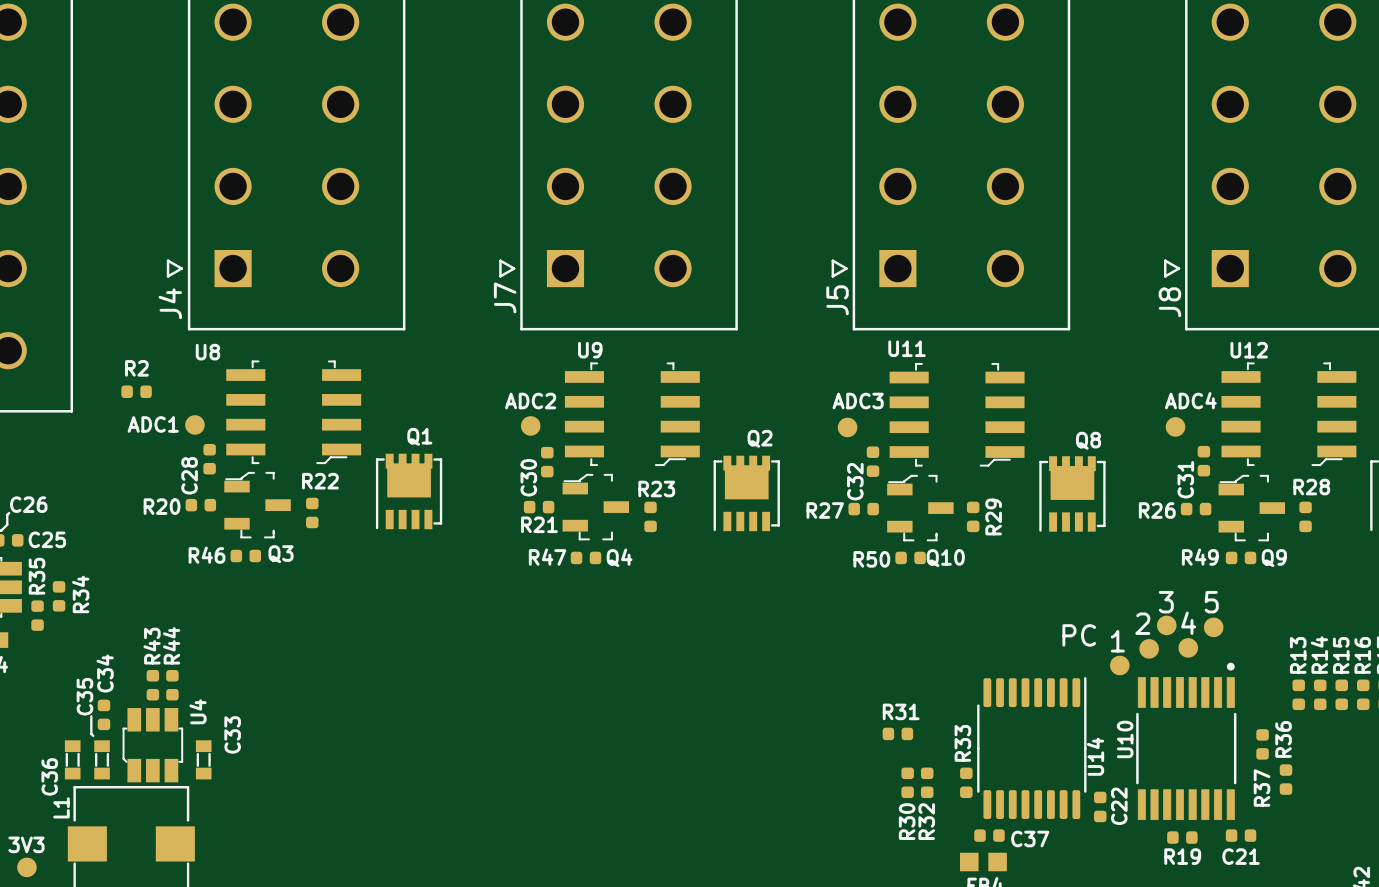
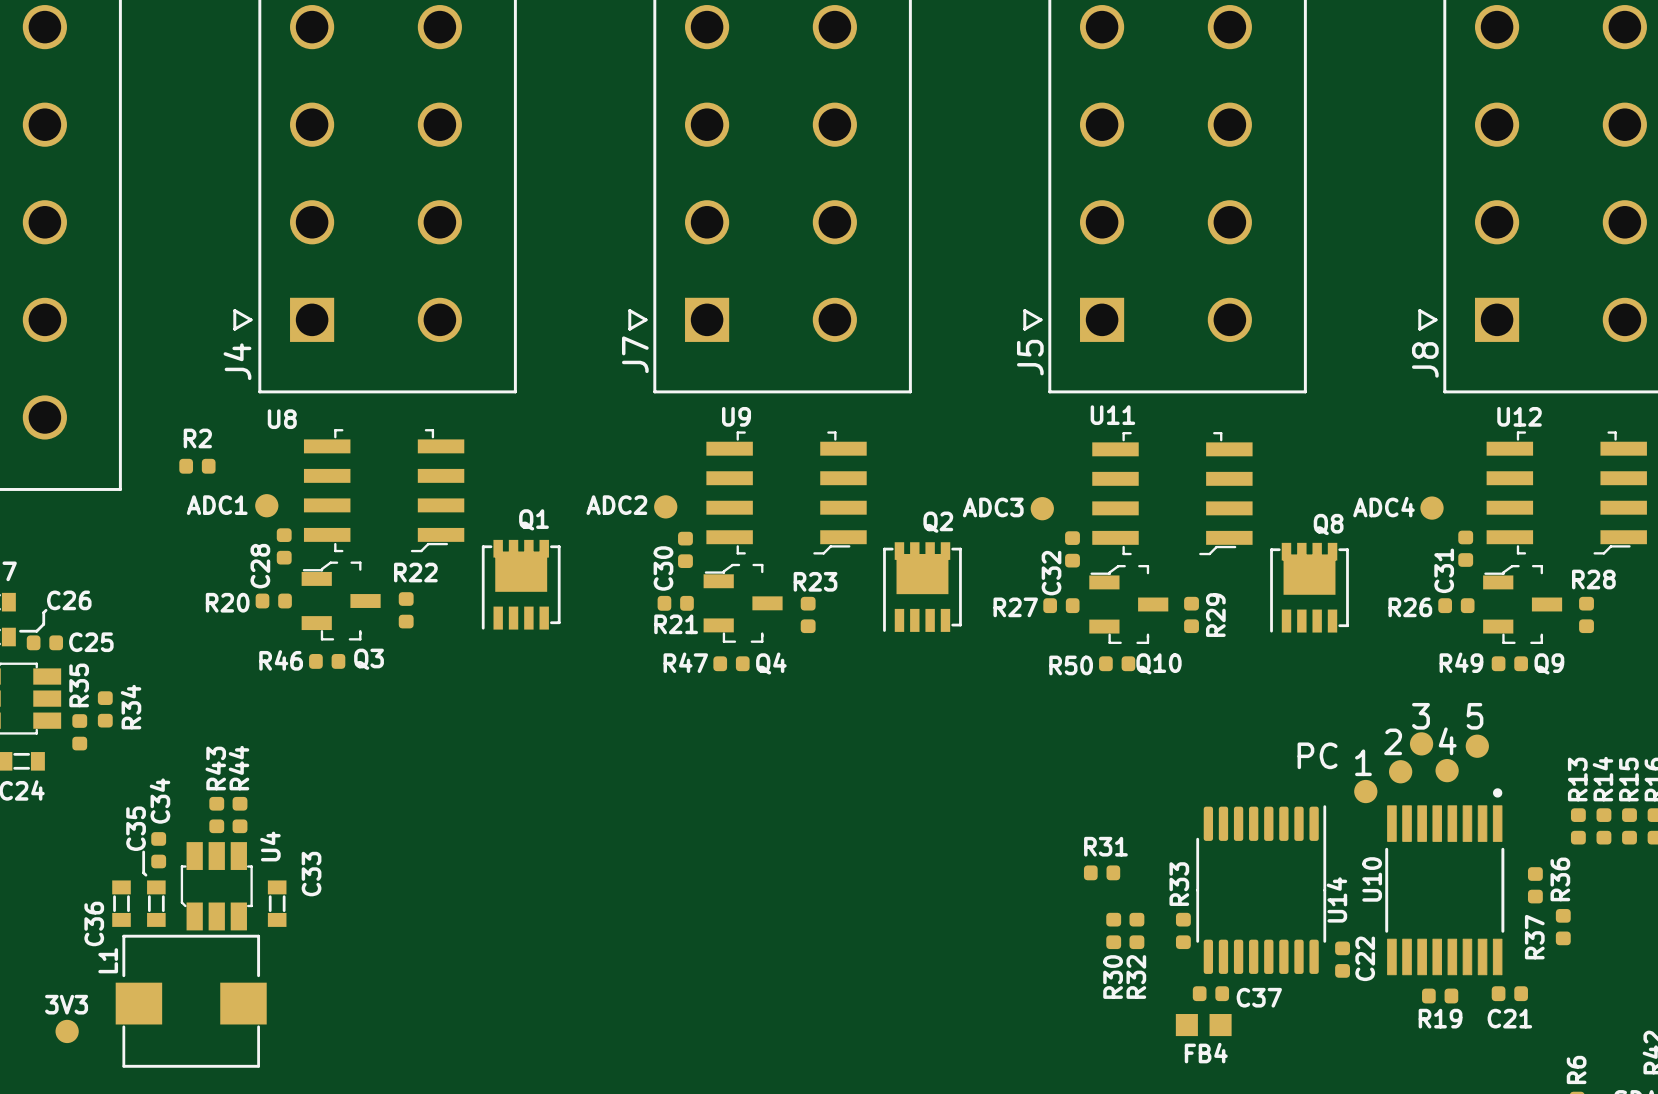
text position: ADC4 (1190, 400) -> ADC4 (1383, 507)
text position: ADC2 (530, 401) -> ADC2 (616, 505)
text position: ADC3 (858, 401) -> ADC3 (993, 507)

